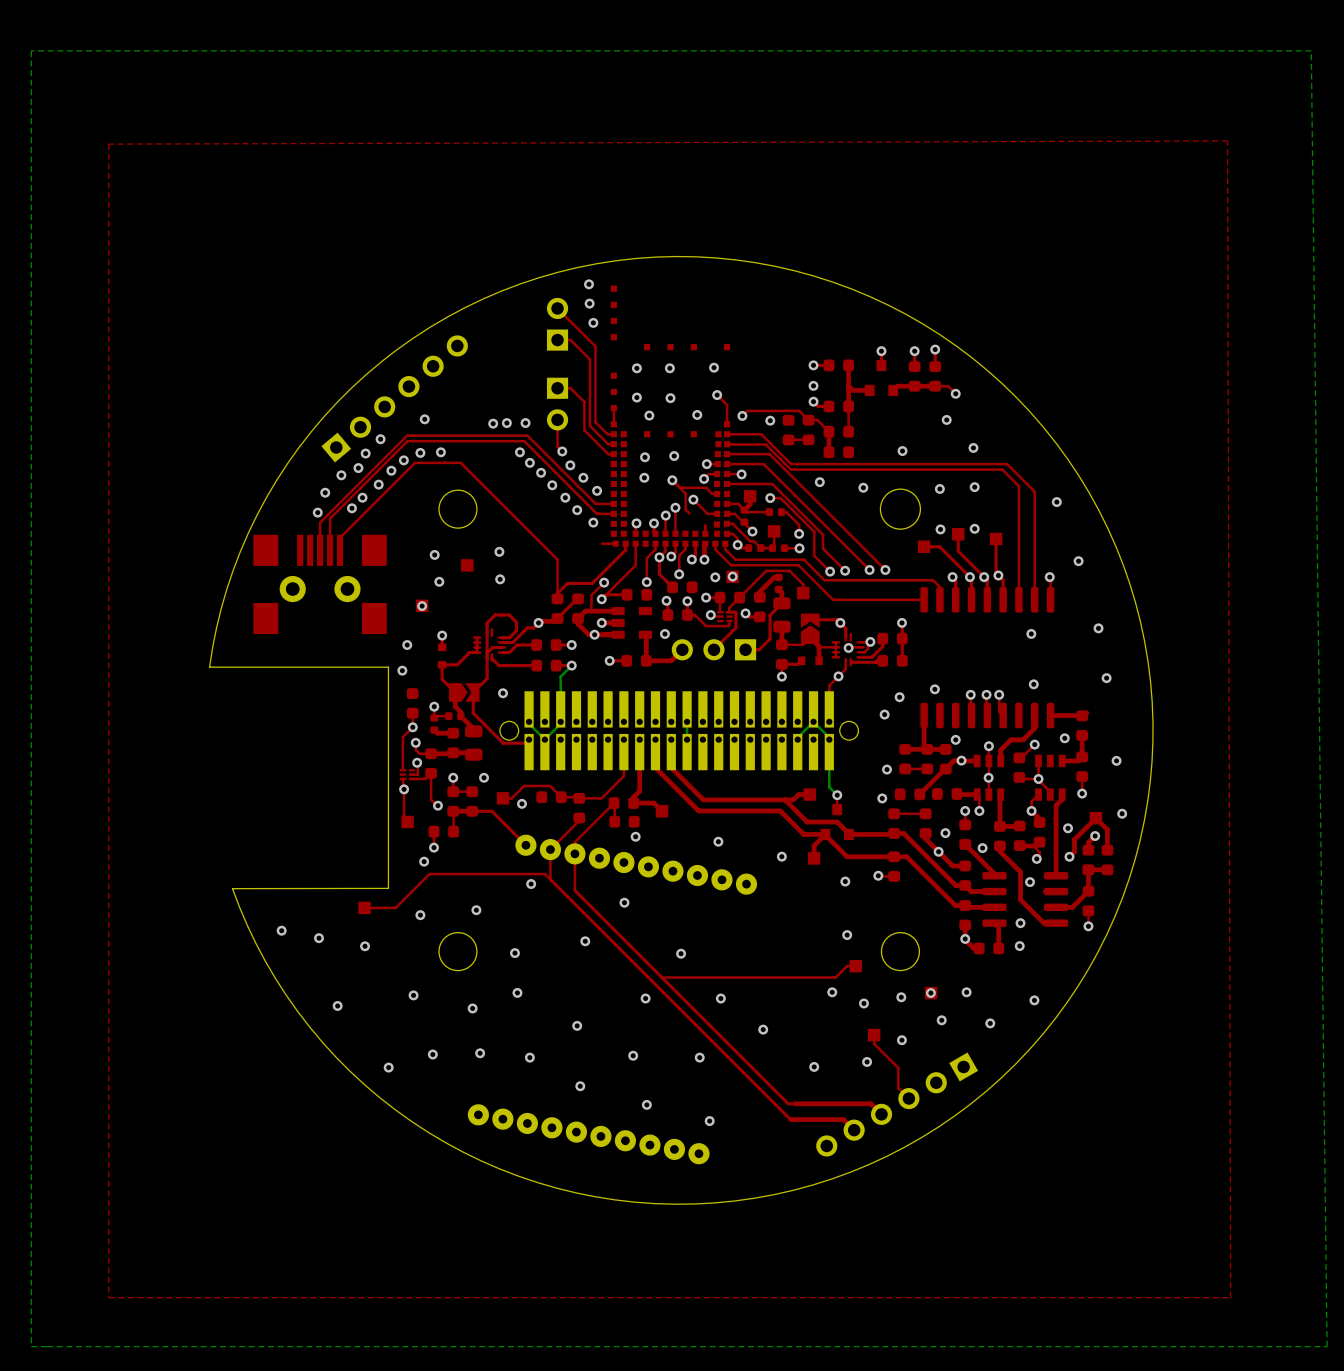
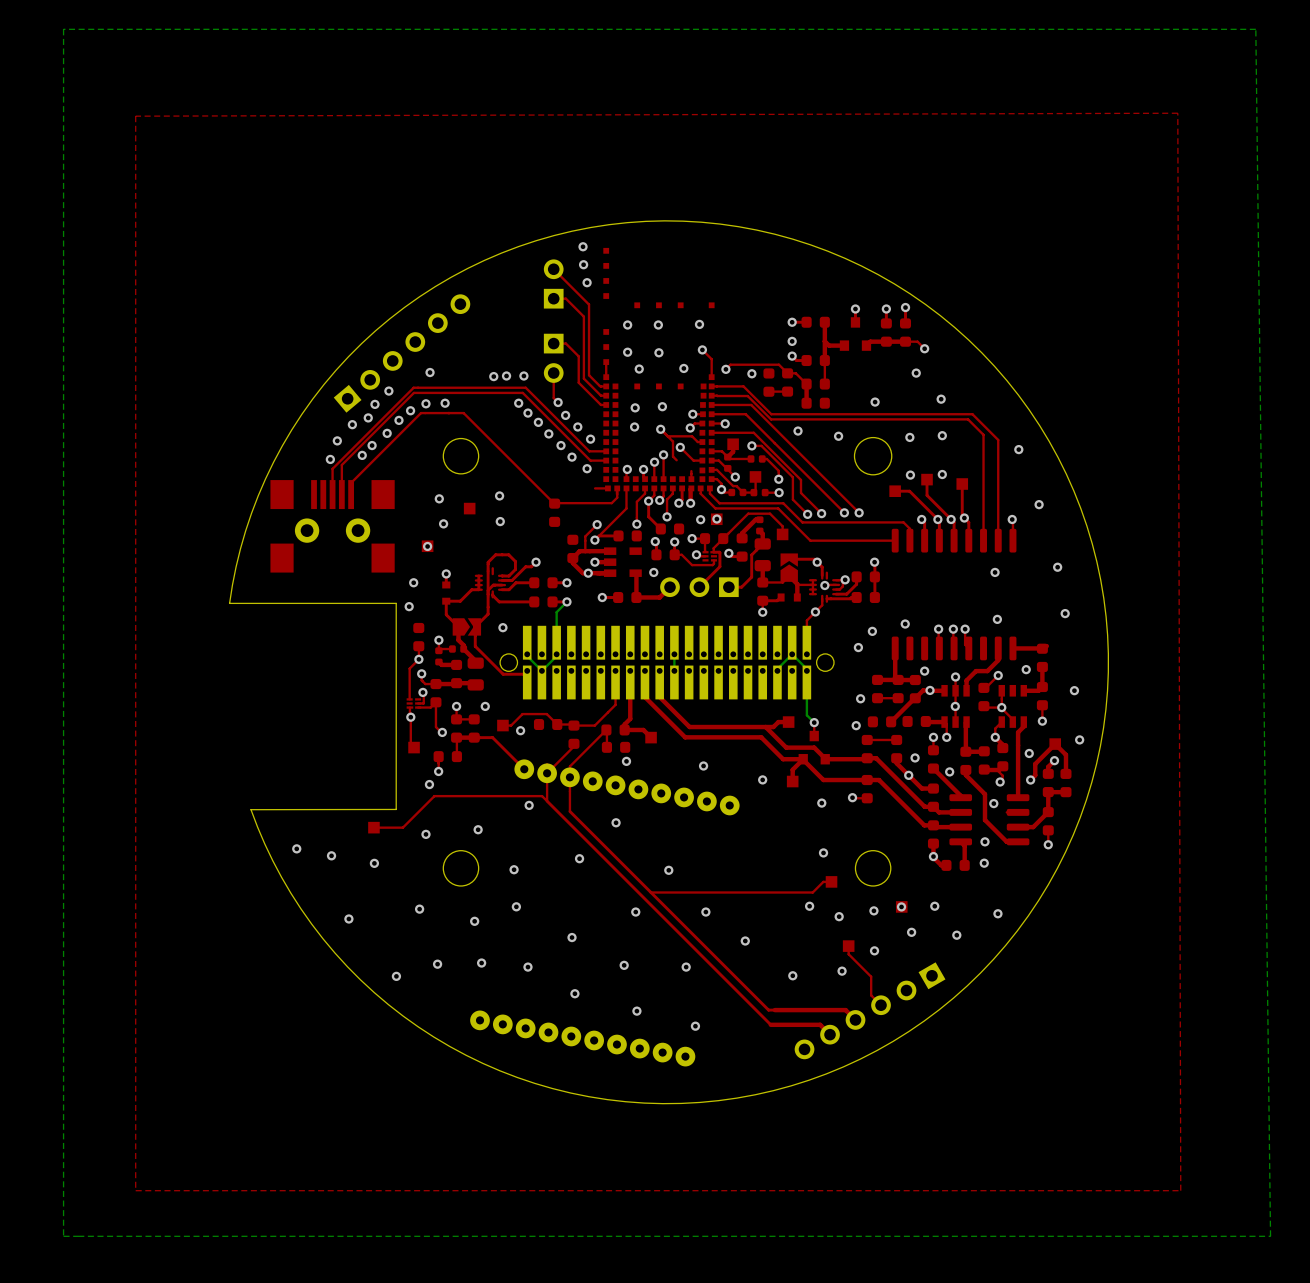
top track: (625, 549) (592, 583) (567, 583) (557, 593) (557, 598) (557, 559) -> (617, 494) (617, 497) (611, 503) (553, 503)
top track: (577, 598) (557, 618) (557, 621) (540, 621) -> none
part position: (557, 608) -> (554, 512)

